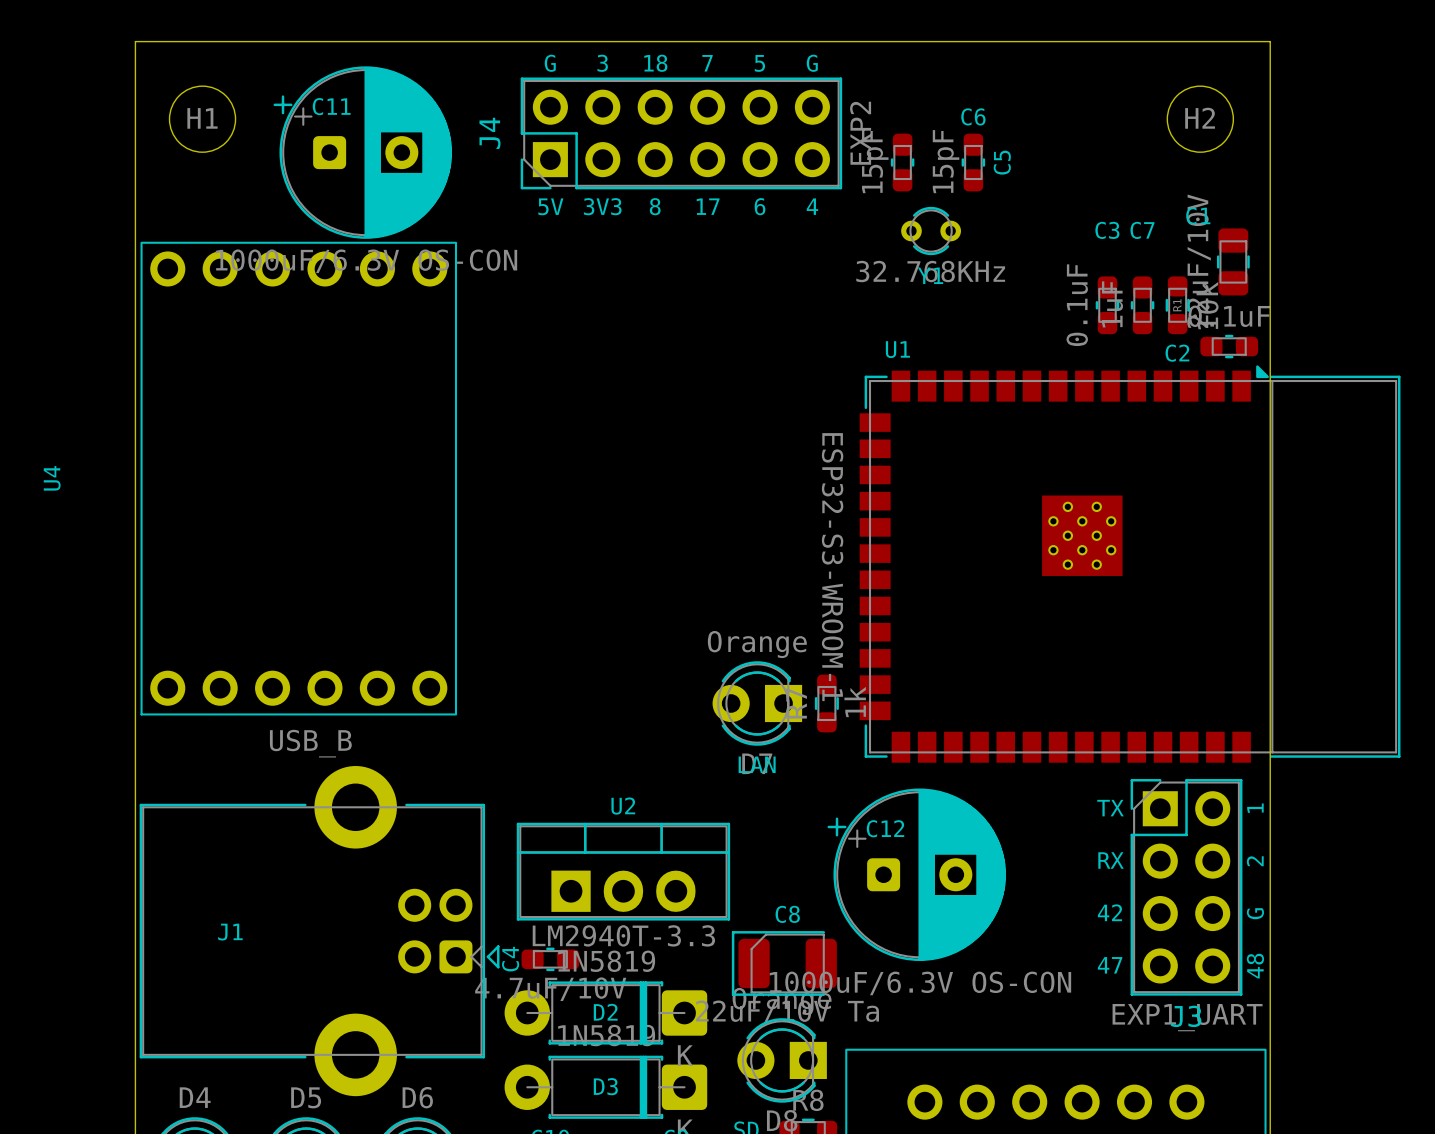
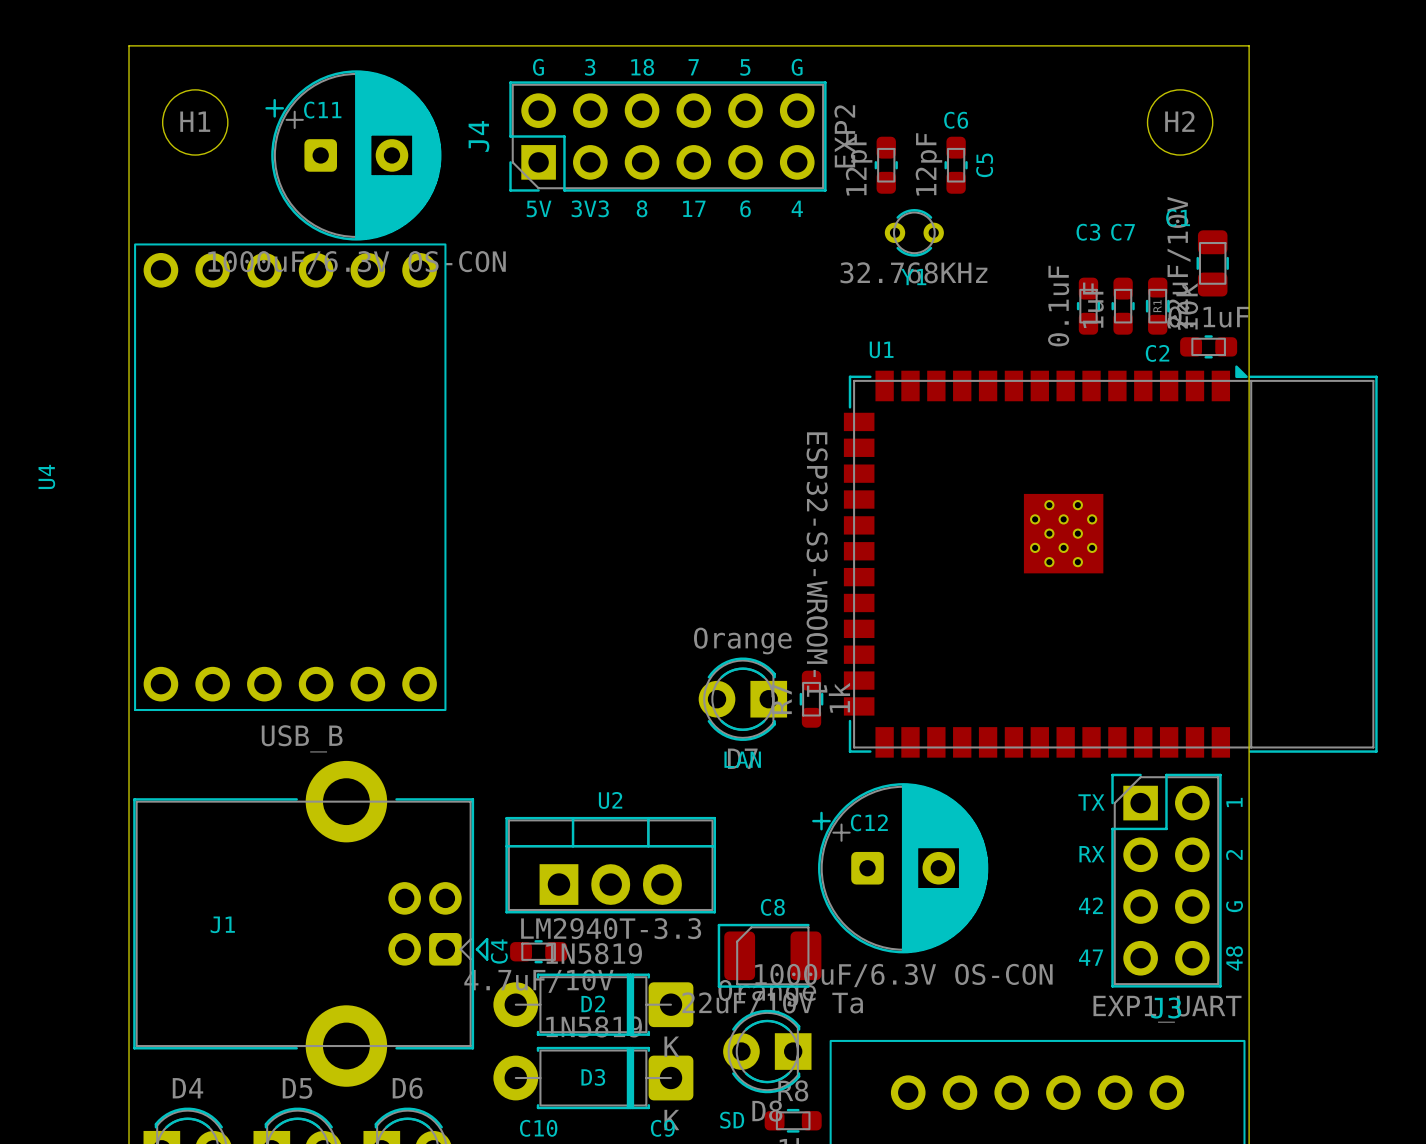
C6 value: 15pF (875, 161) -> 12pF (859, 164)
C5 value: 15pF (946, 161) -> 12pF (928, 164)

